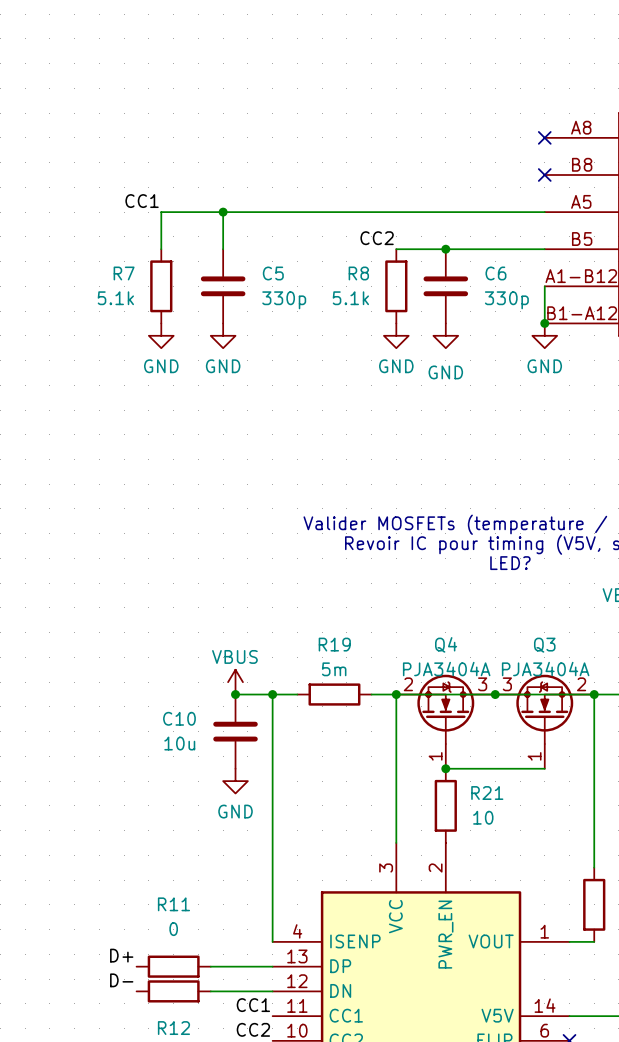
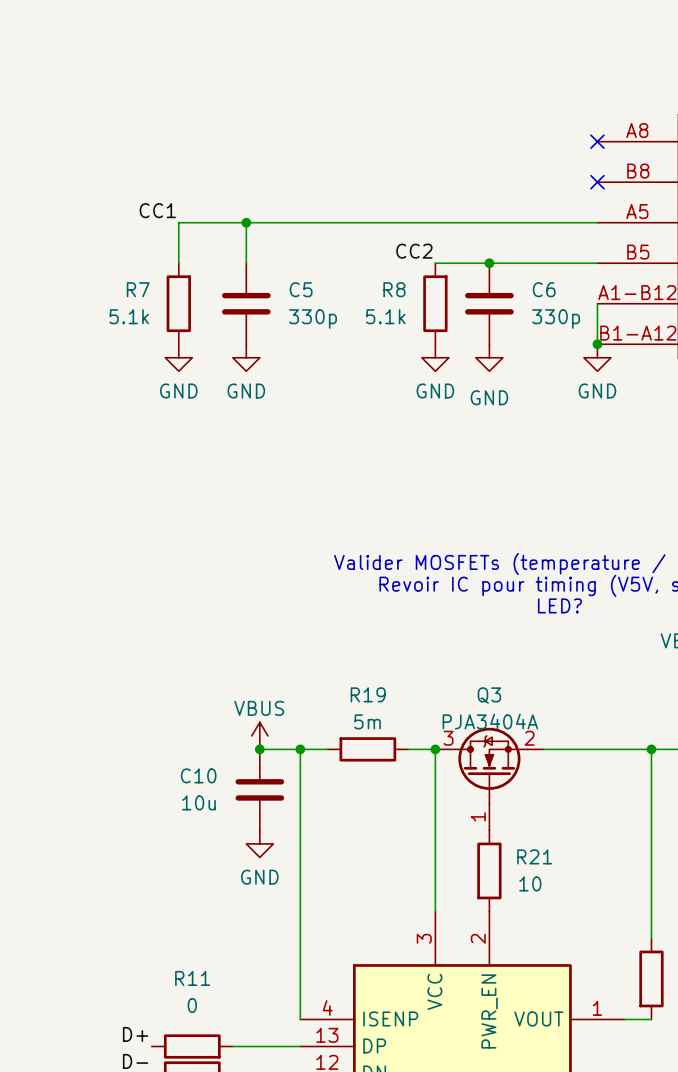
junction: (495, 694) -> none
Q4: PJA3404A (445, 721) -> none
Q3 position: (544, 721) -> (489, 779)
wire: (445, 768) (544, 768) -> none
junction: (445, 768) -> none

